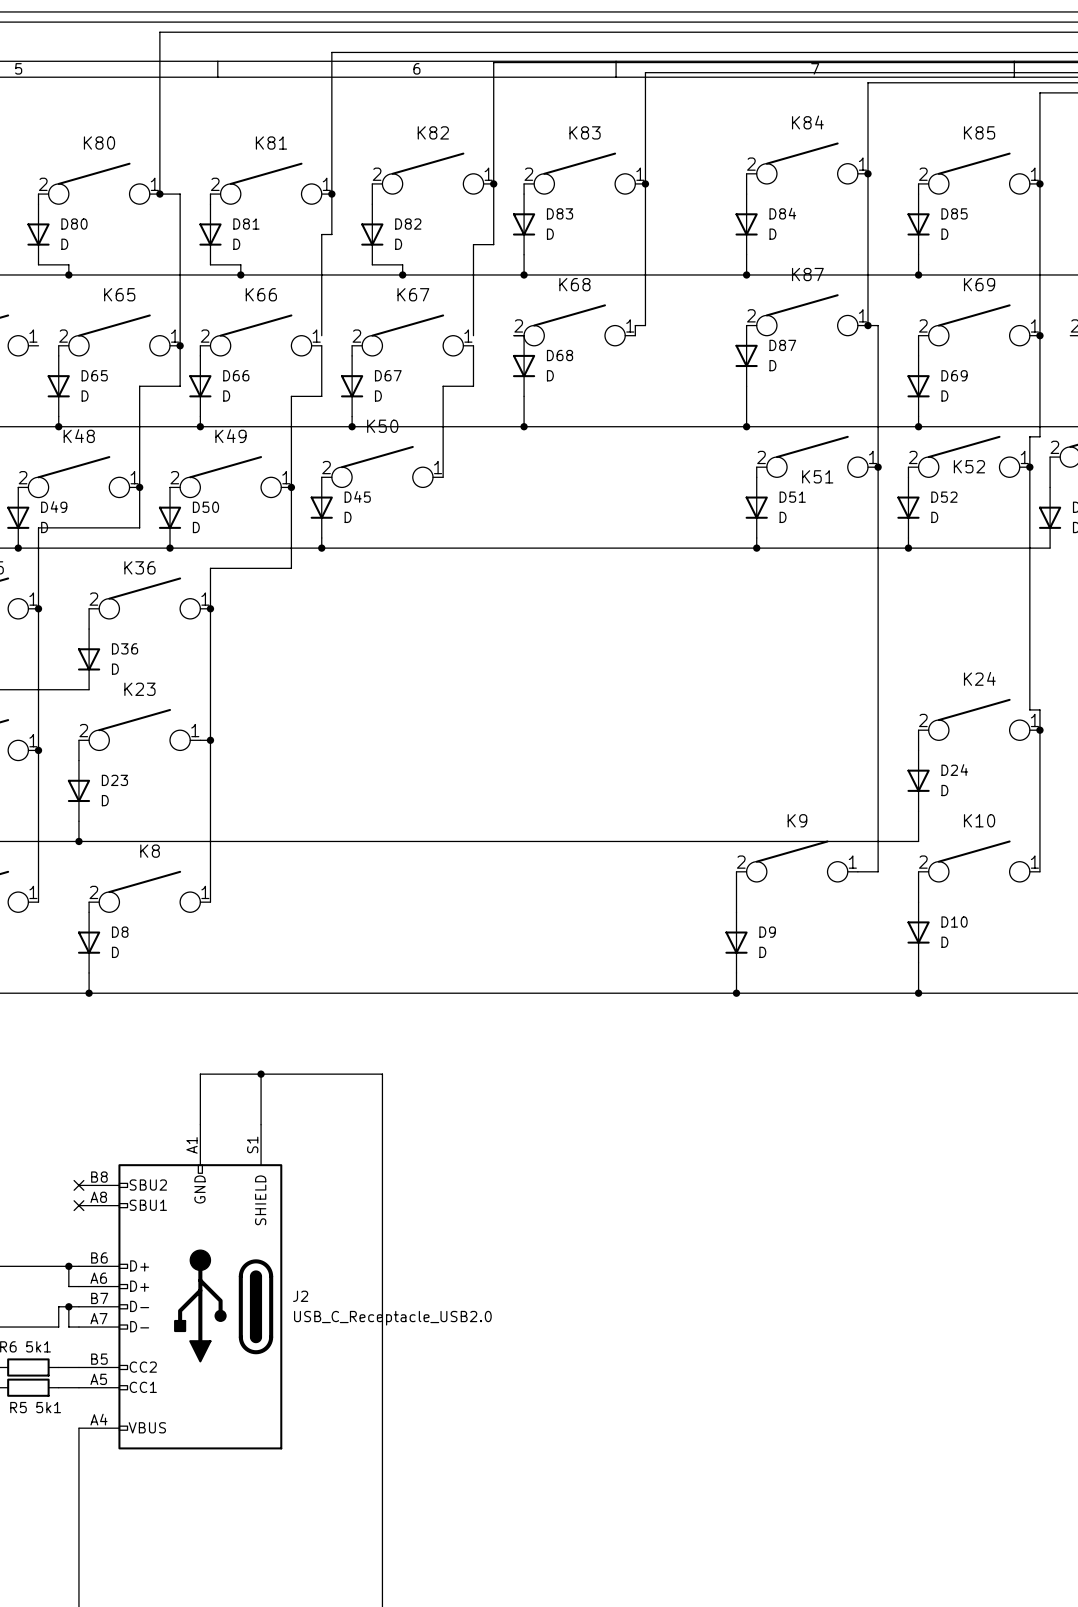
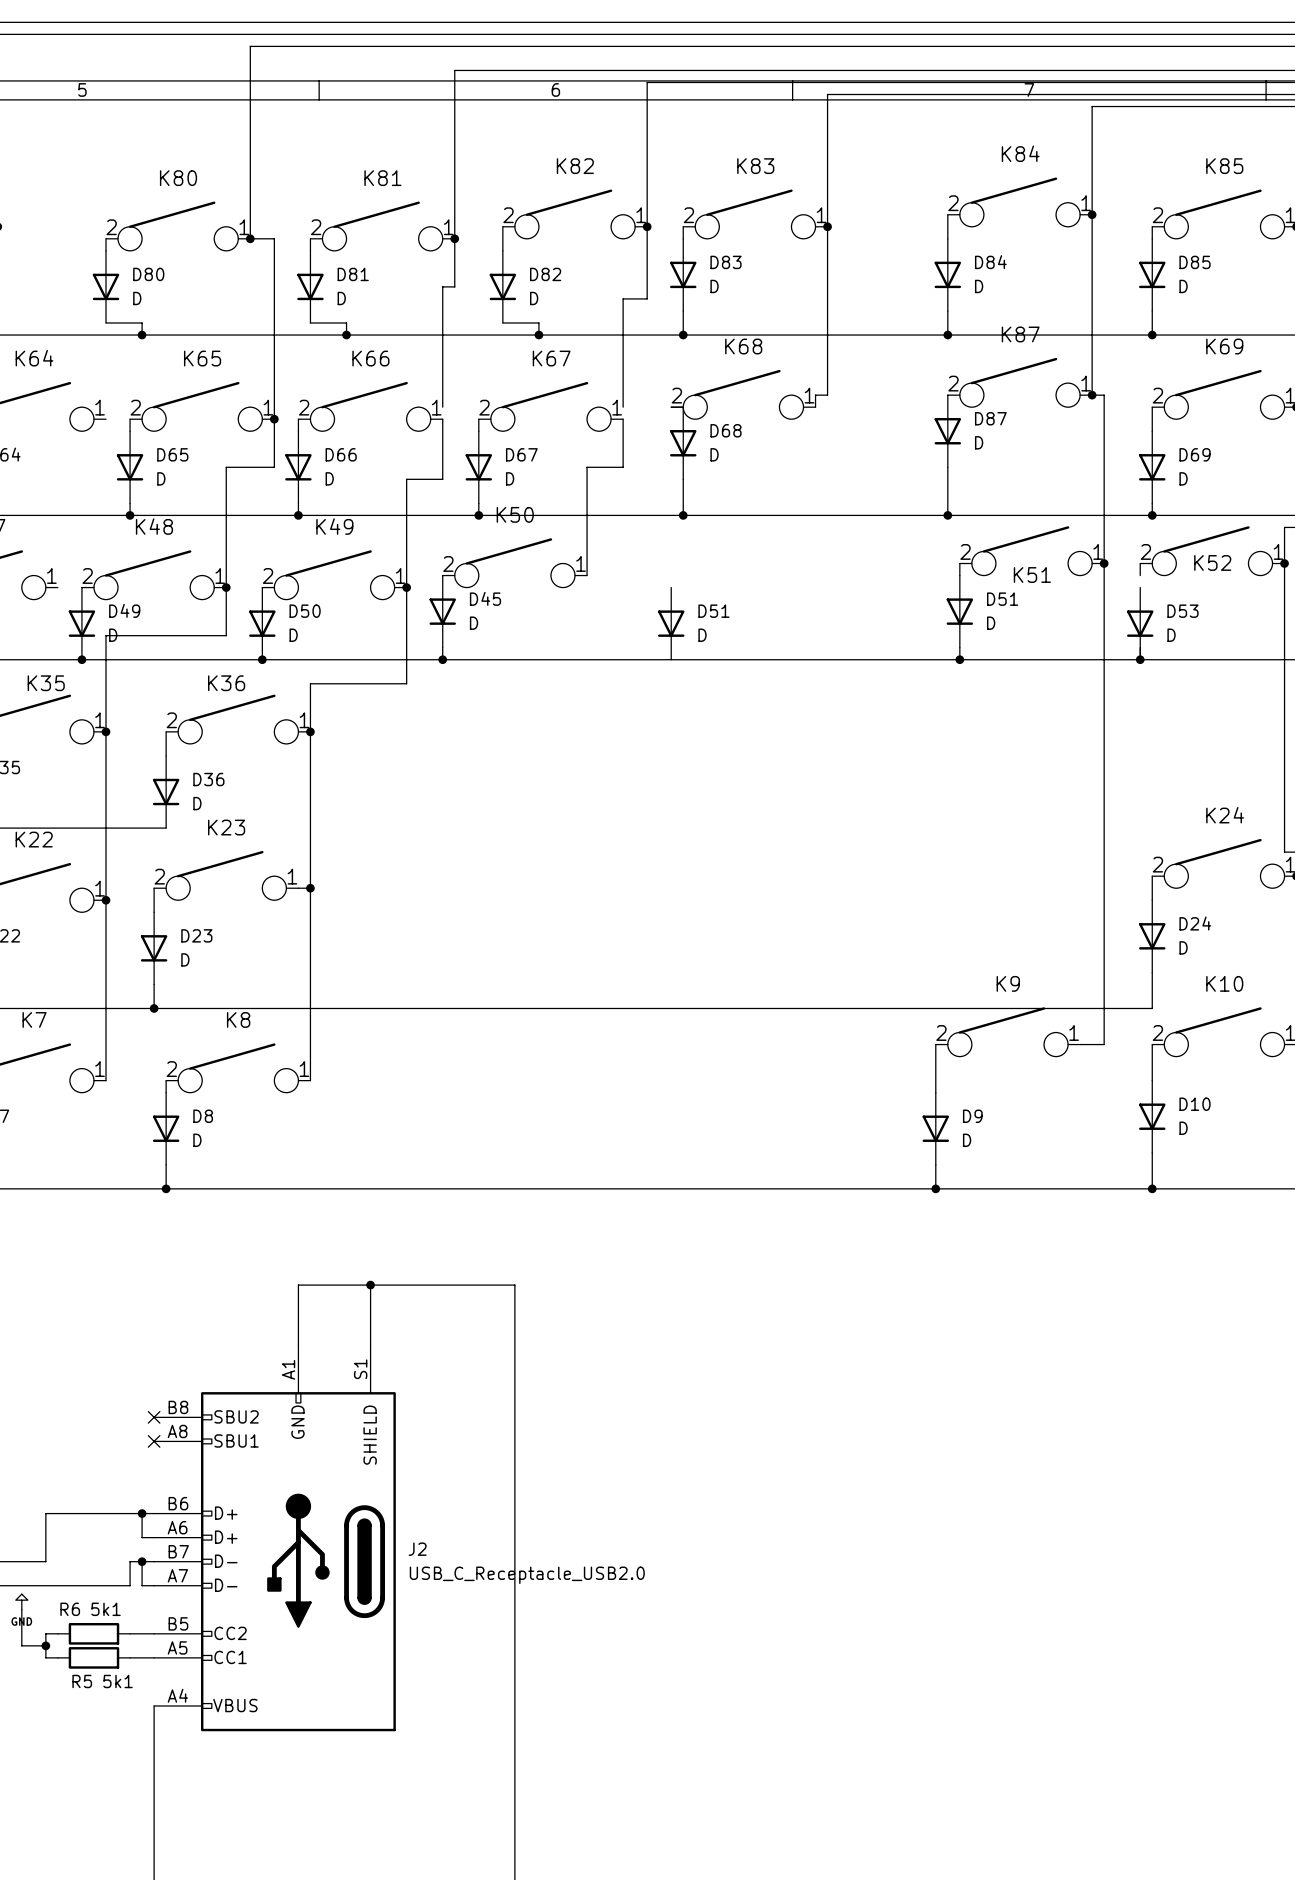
D52: D (908, 507) -> none
D51: none -> D (671, 623)
D53: none -> D (1140, 623)

